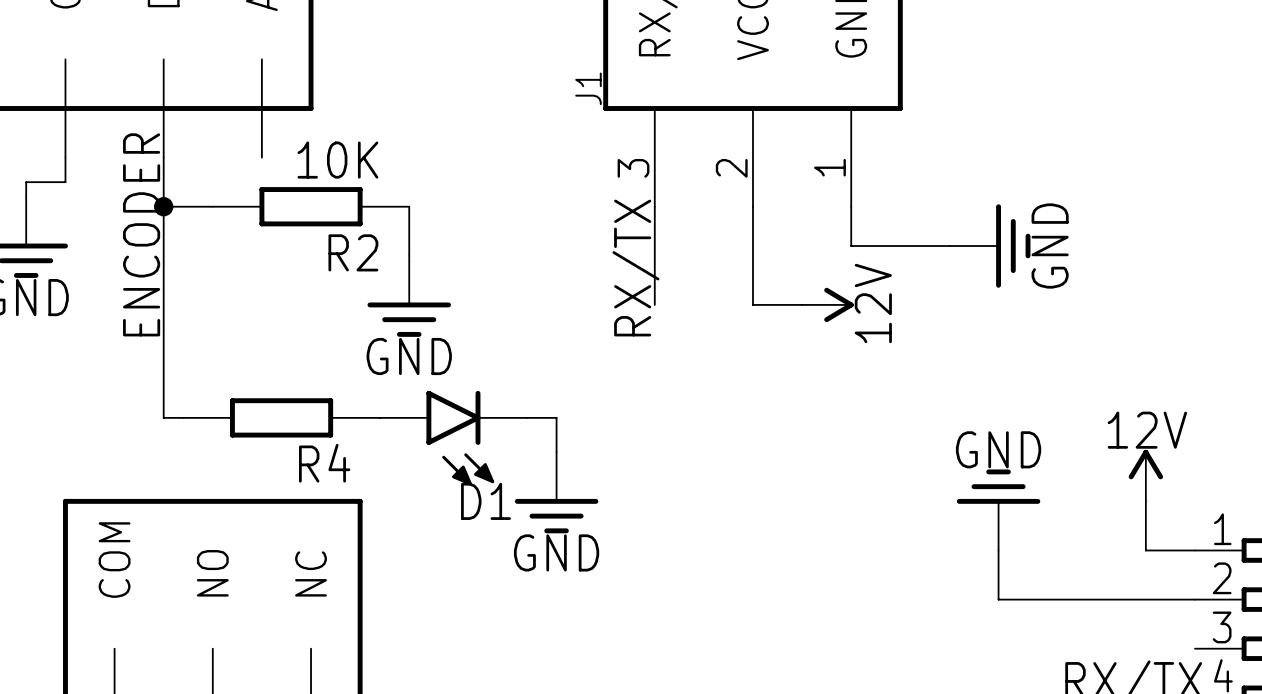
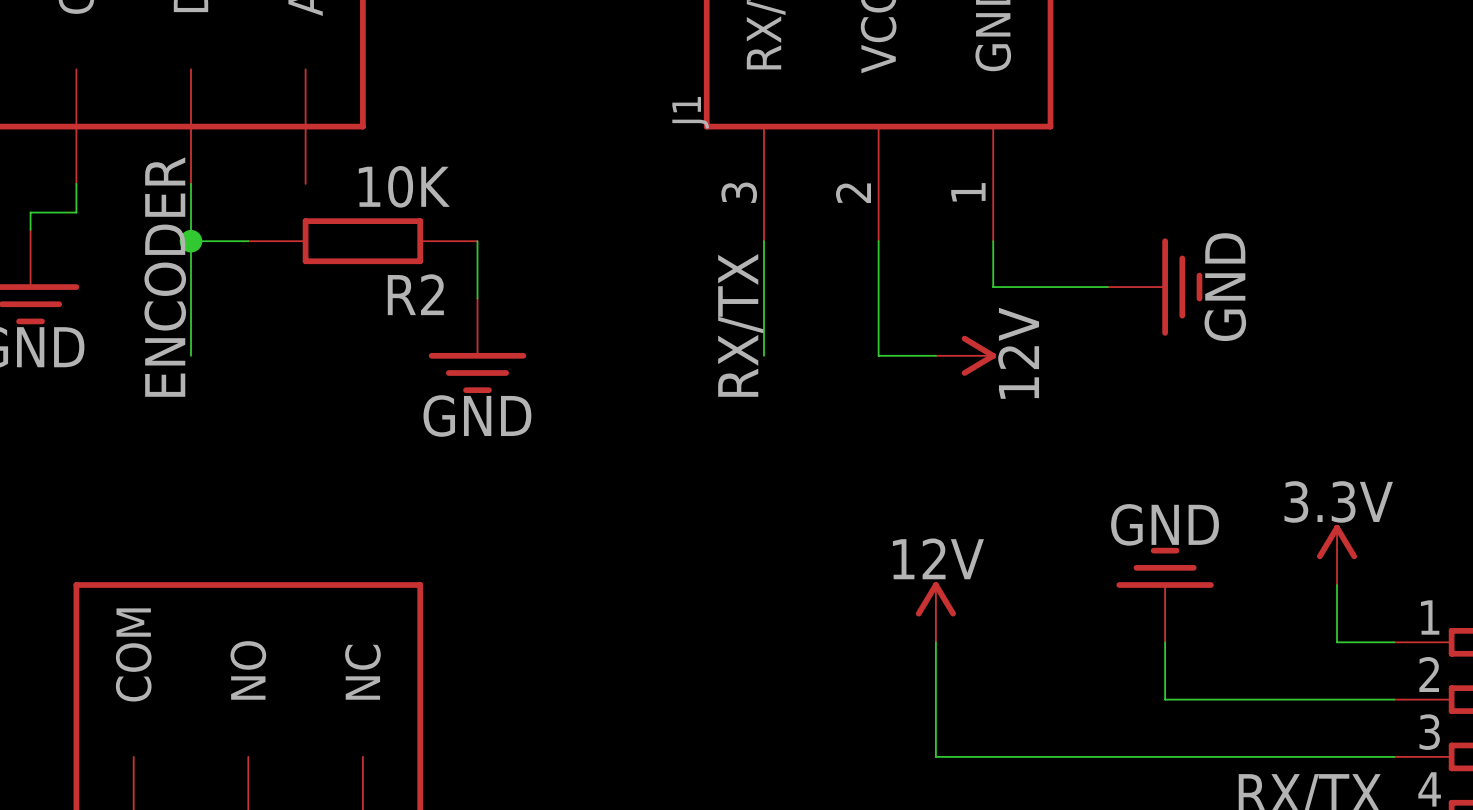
wire: (163, 304) (163, 417) (183, 417) -> none
R4: (281, 417) -> none
wire: (527, 417) (556, 417) (556, 452) -> none
D1: (453, 438) -> none
power symbol: 12V (1145, 475) -> 3.3V (1337, 554)
power symbol: GND (556, 492) -> none
power symbol: none -> 12V (935, 612)
wire: none -> (935, 642) (935, 756) (1394, 756)

